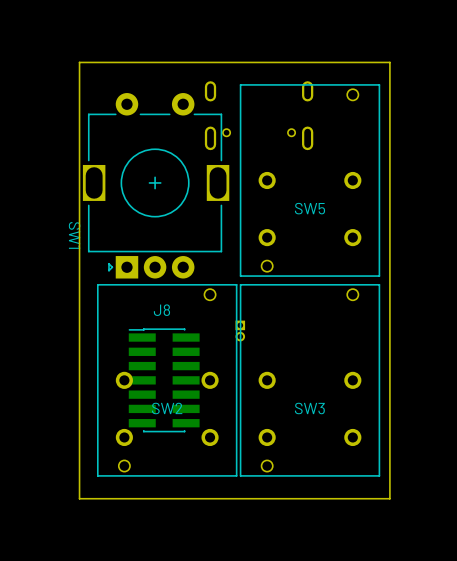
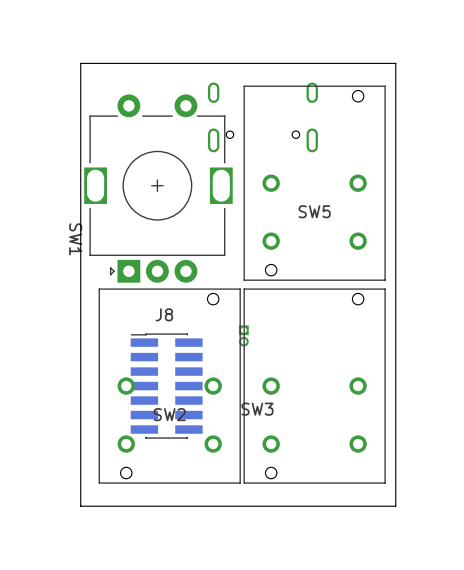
SW3 name position: SW3 (309, 408) -> SW3 (257, 409)

